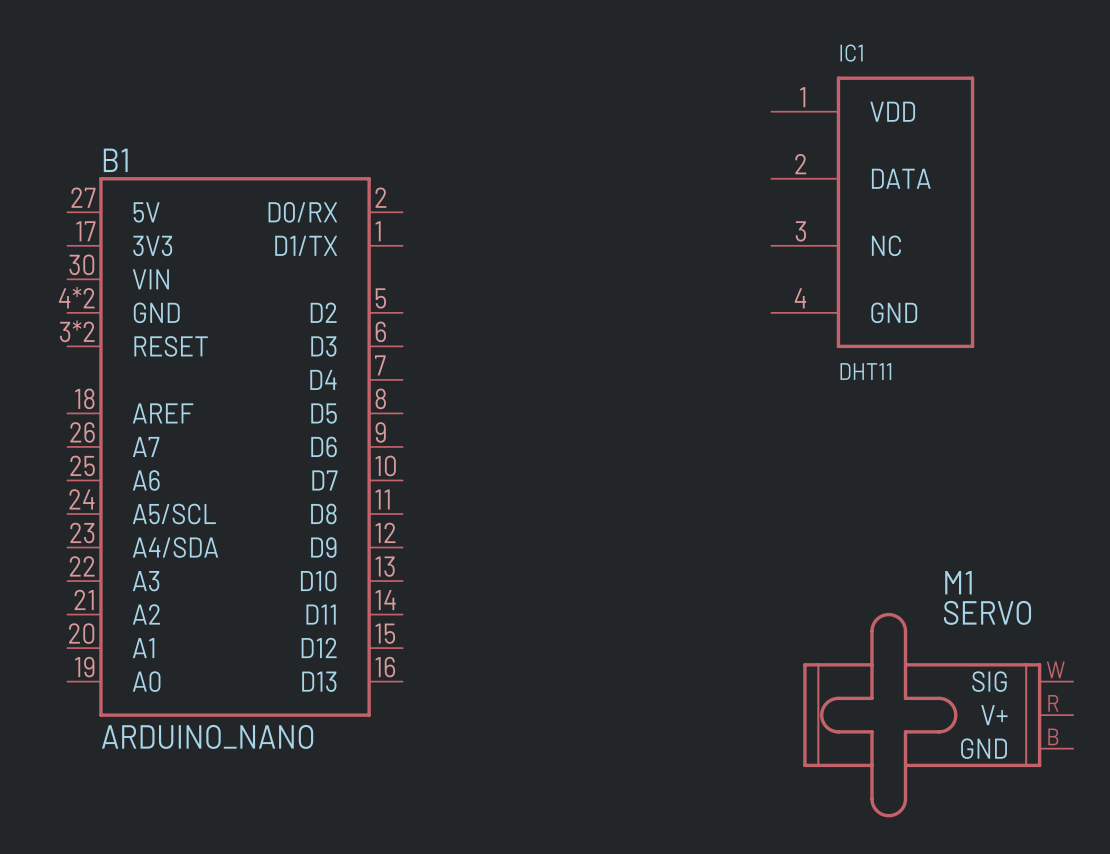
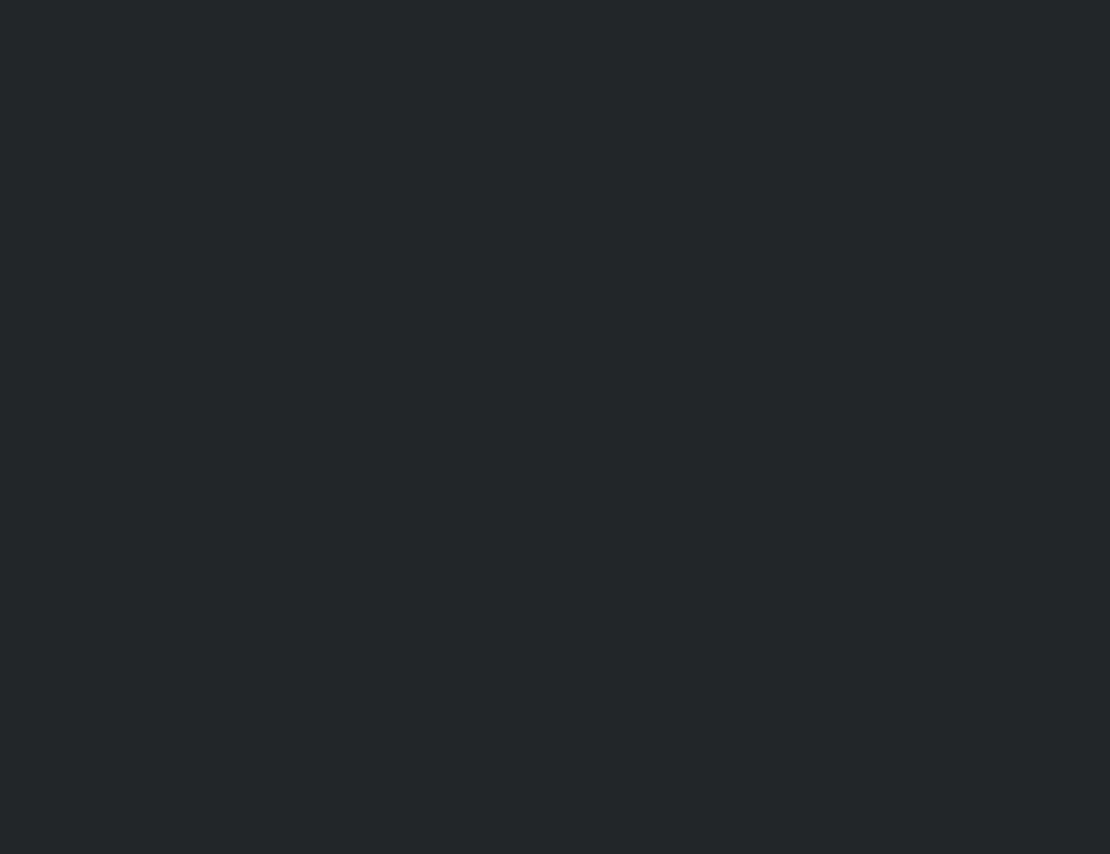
IC1: DHT11 (872, 212) -> none
B1: ARDUINO_NANO (235, 446) -> none
M1: SERVO (938, 715) -> none

